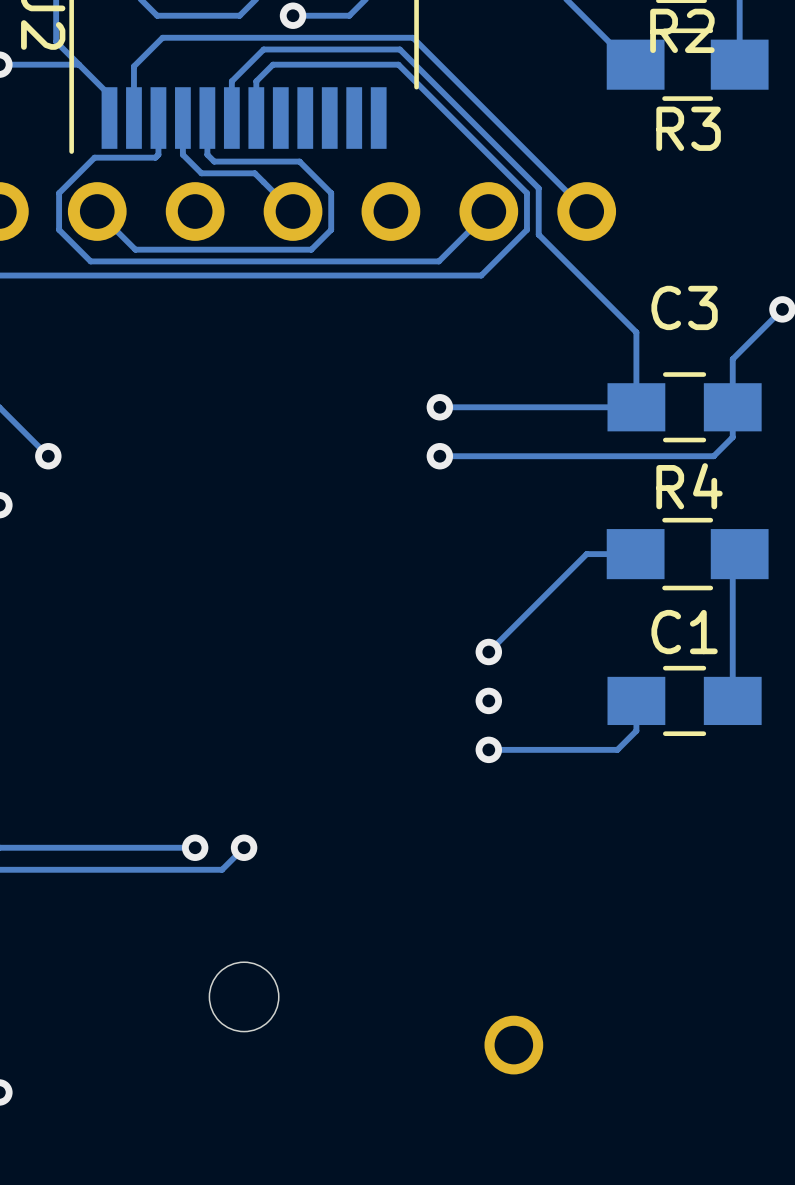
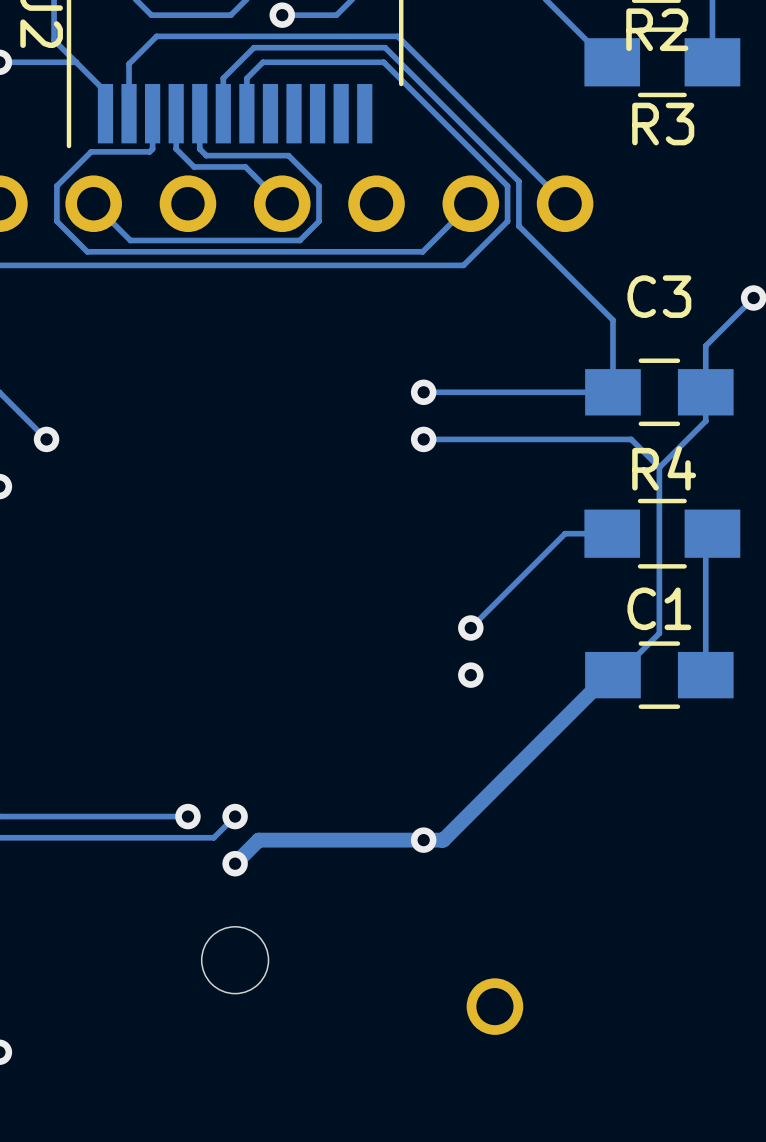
track: none -> (631, 439) (659, 467)
track: (713, 456) (655, 456) -> (687, 439) (659, 467)
track: none -> (659, 467) (659, 633) (617, 675) (608, 675) (443, 840) (258, 840) (235, 863)
track: (636, 700) (636, 730) (617, 749) (488, 749) -> none
via position: (488, 749) -> (423, 840)
via: none -> (235, 863)

